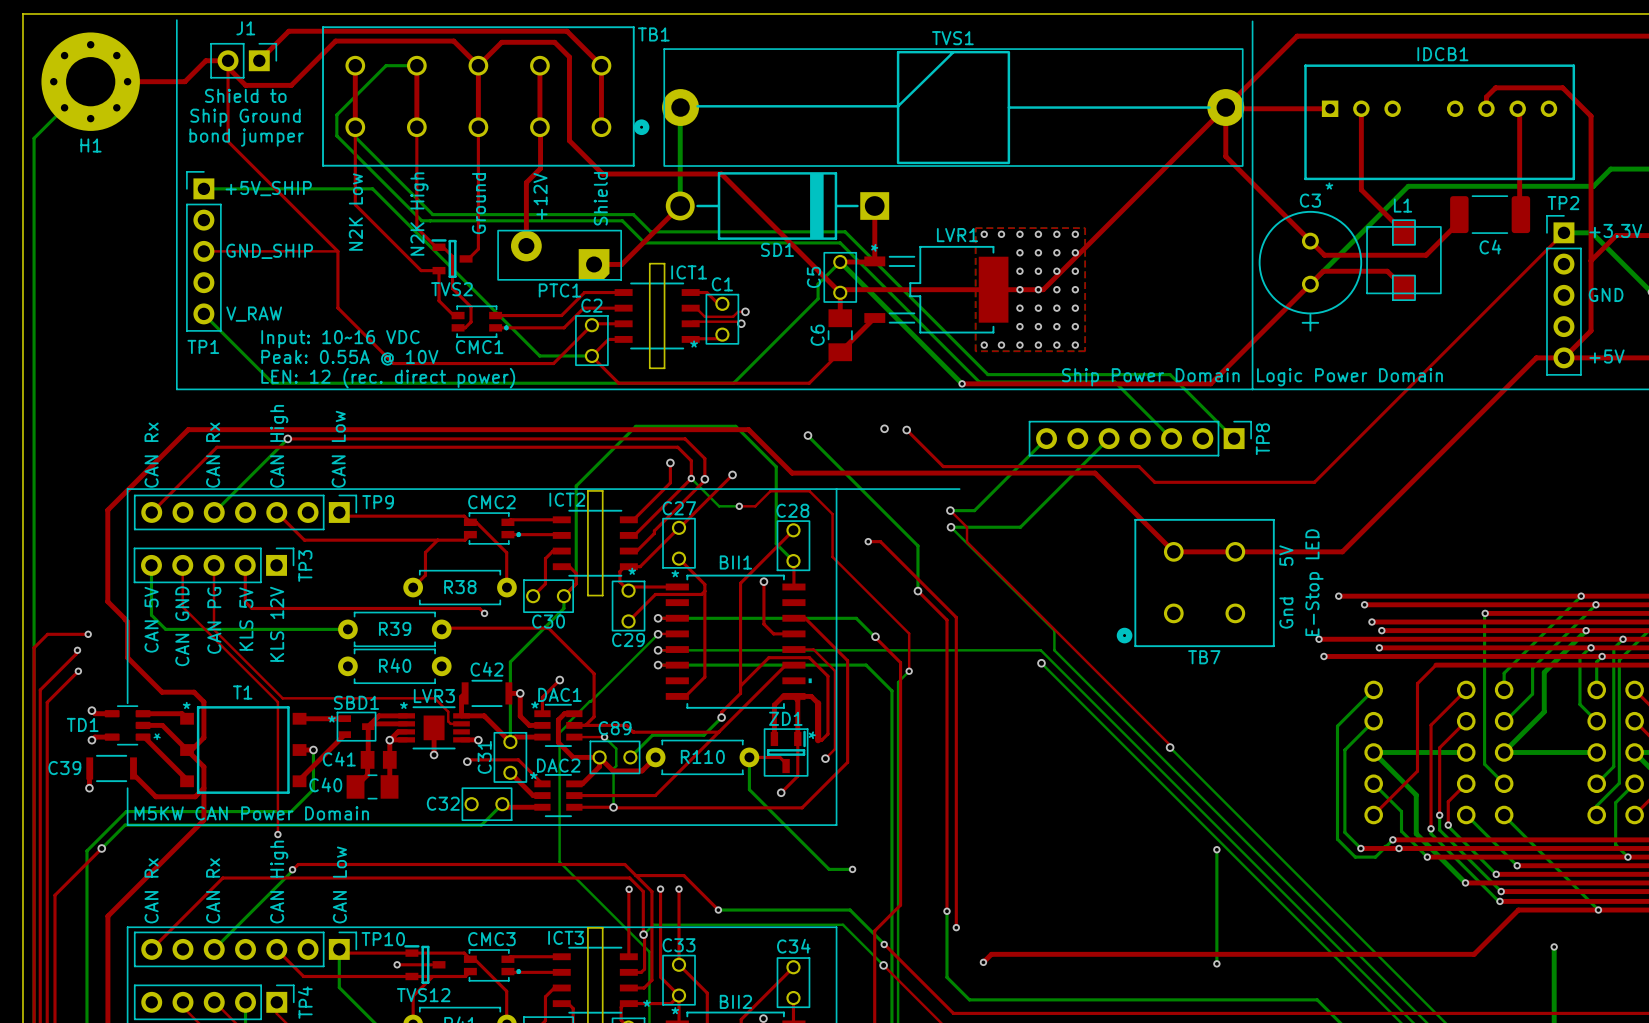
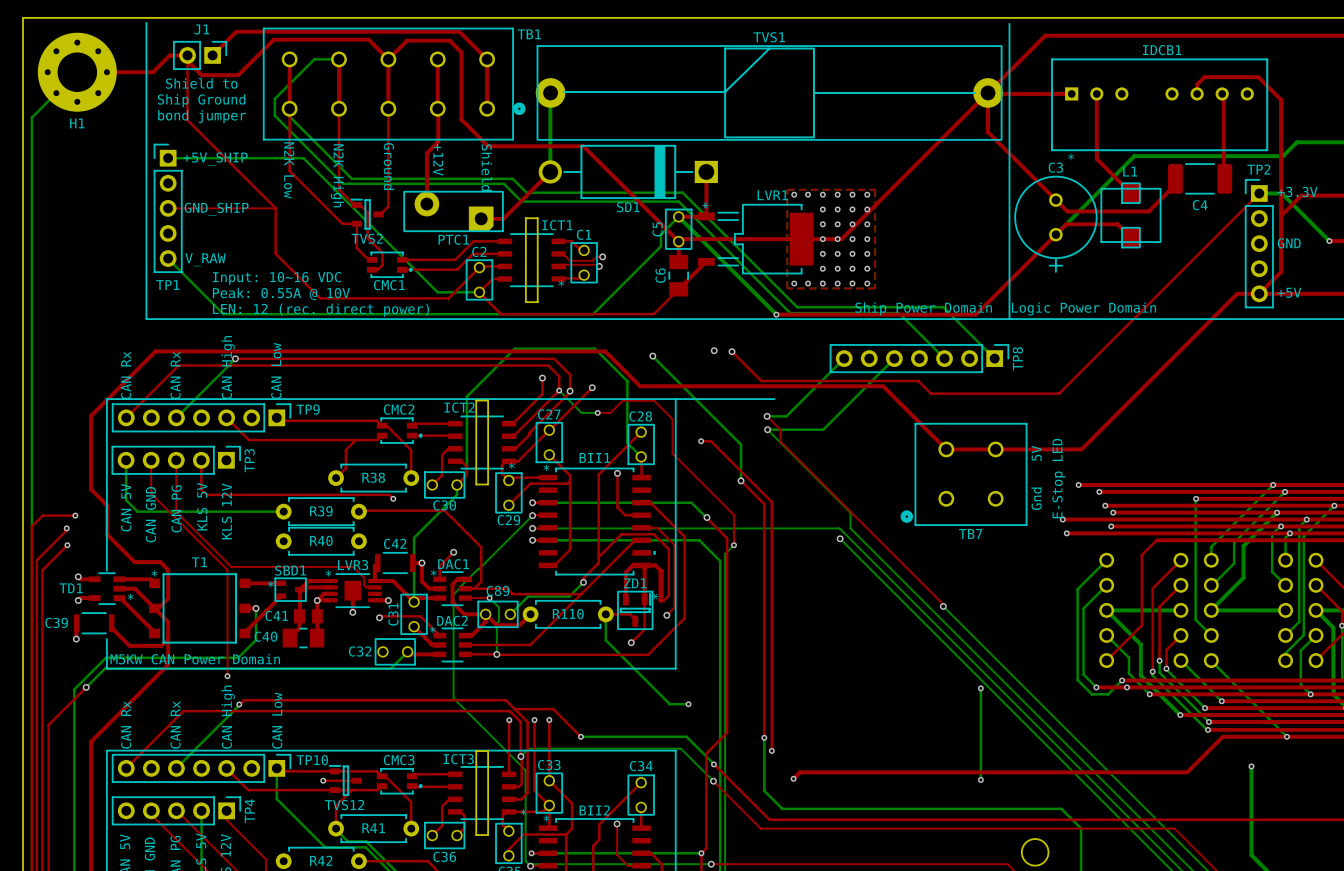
text rotation: 0° (540, 196) -> 180° (438, 159)
text rotation: 0° (600, 198) -> 180° (486, 167)
text rotation: 0° (478, 203) -> 180° (389, 166)
text rotation: 0° (355, 212) -> 180° (289, 170)
text rotation: 0° (419, 214) -> 180° (337, 175)

